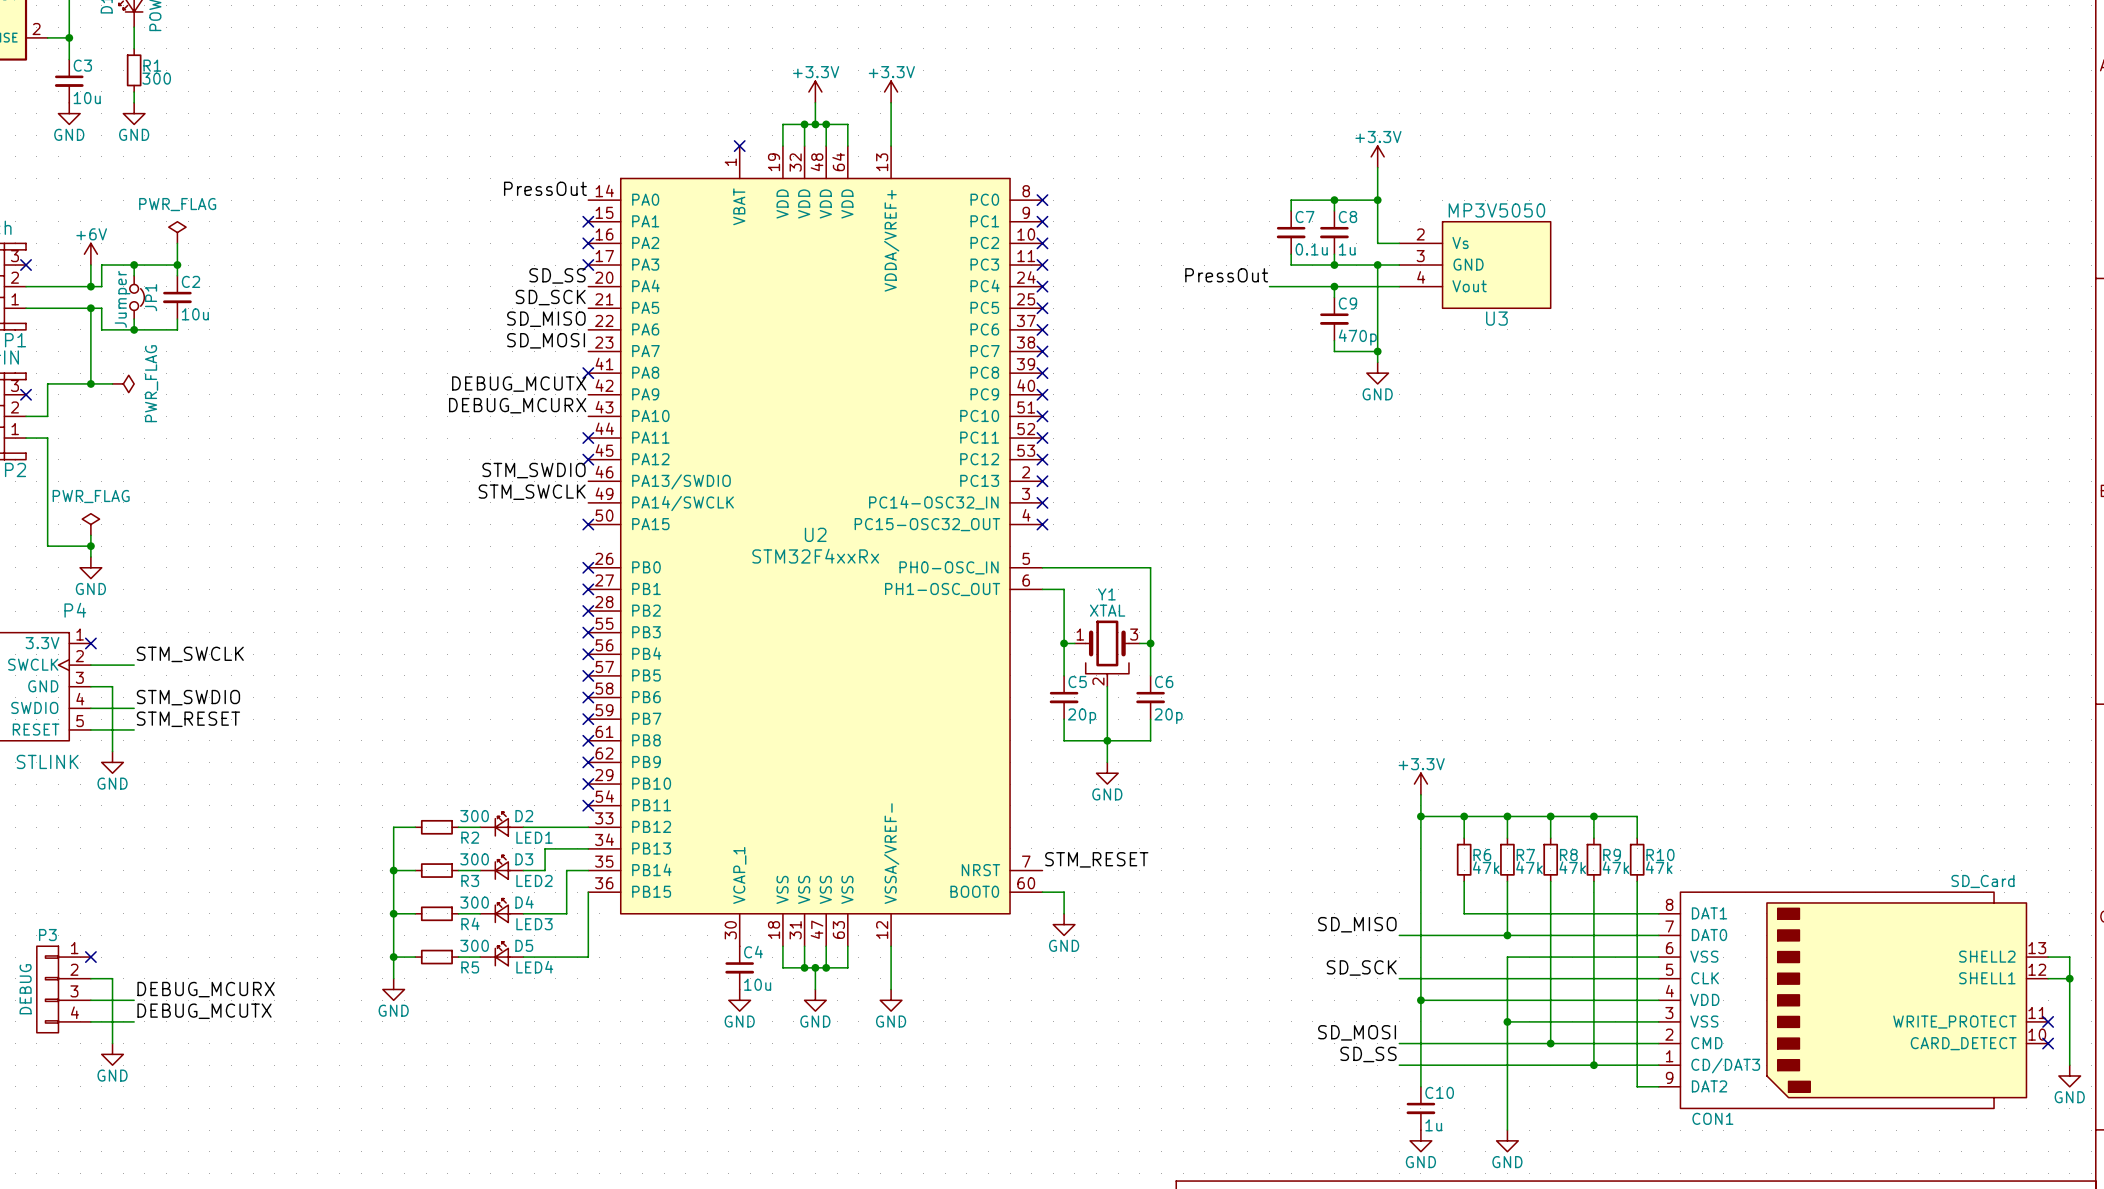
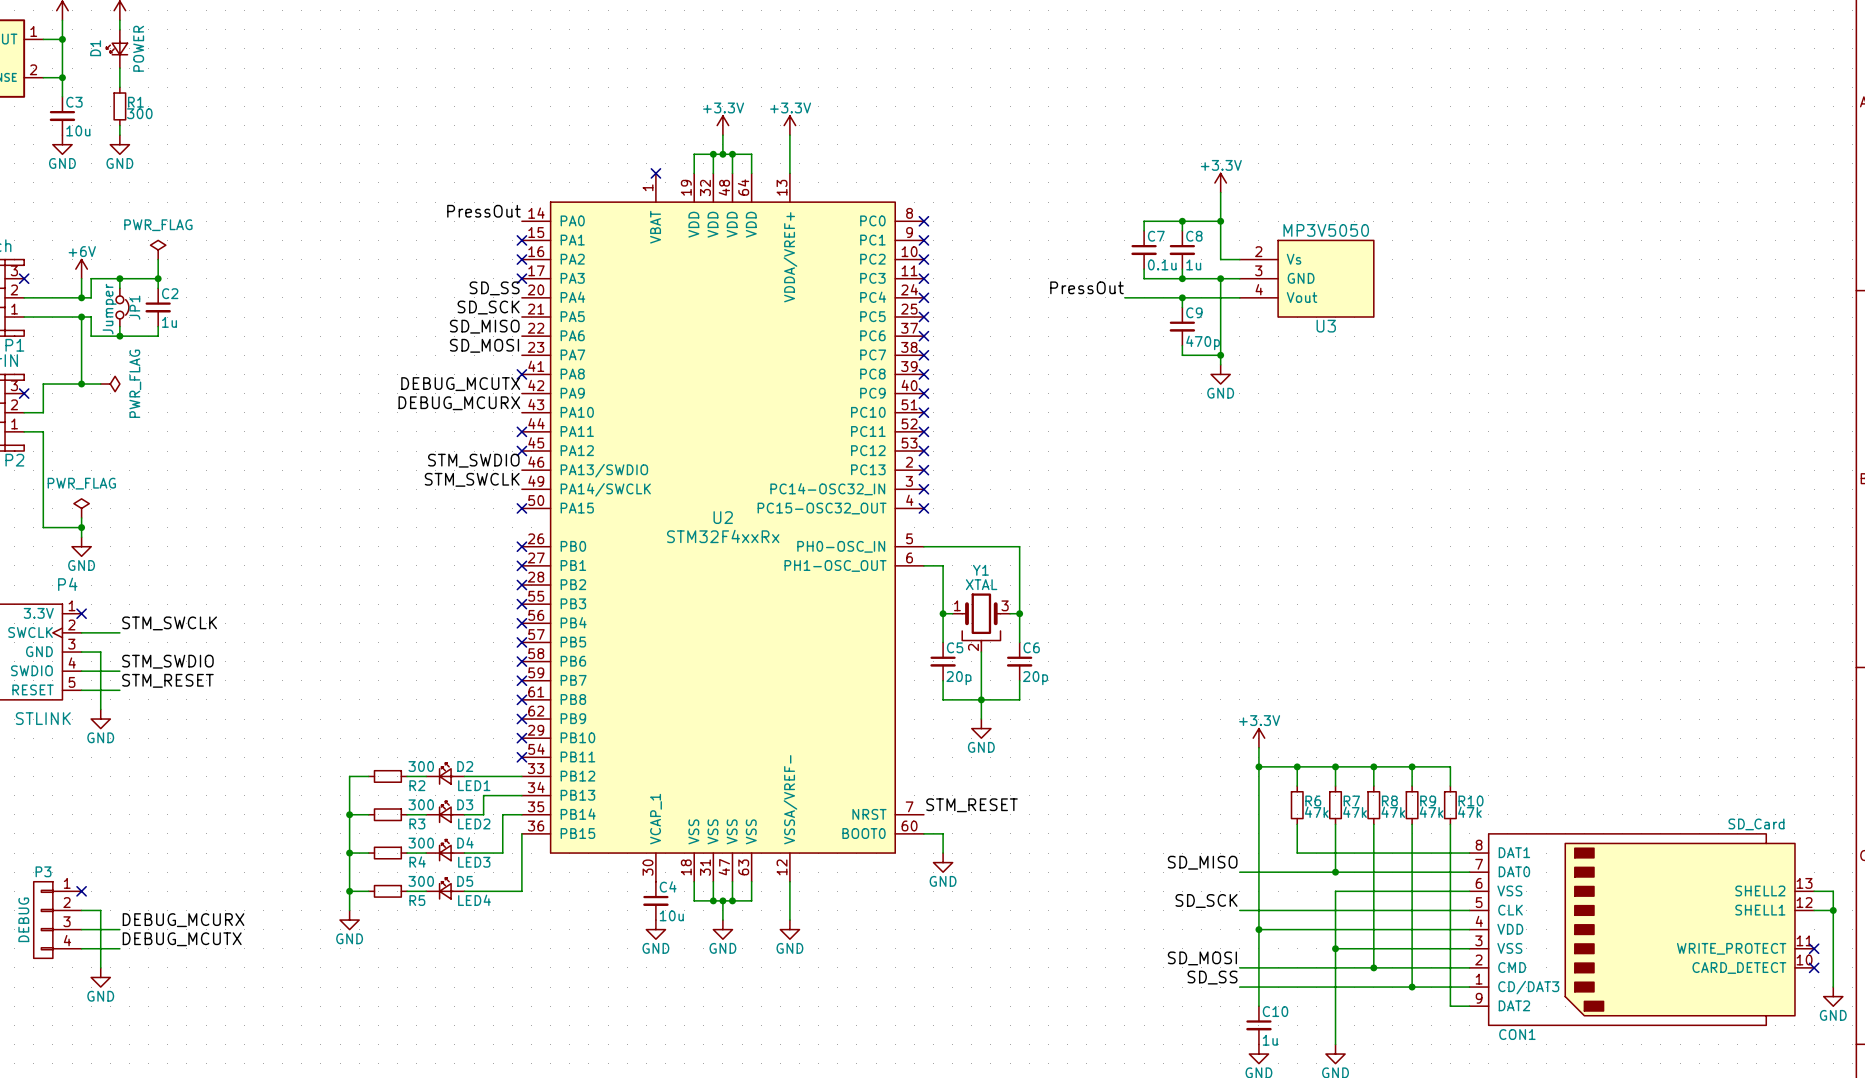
C2 value: 10u (195, 314) -> 1u (169, 322)

